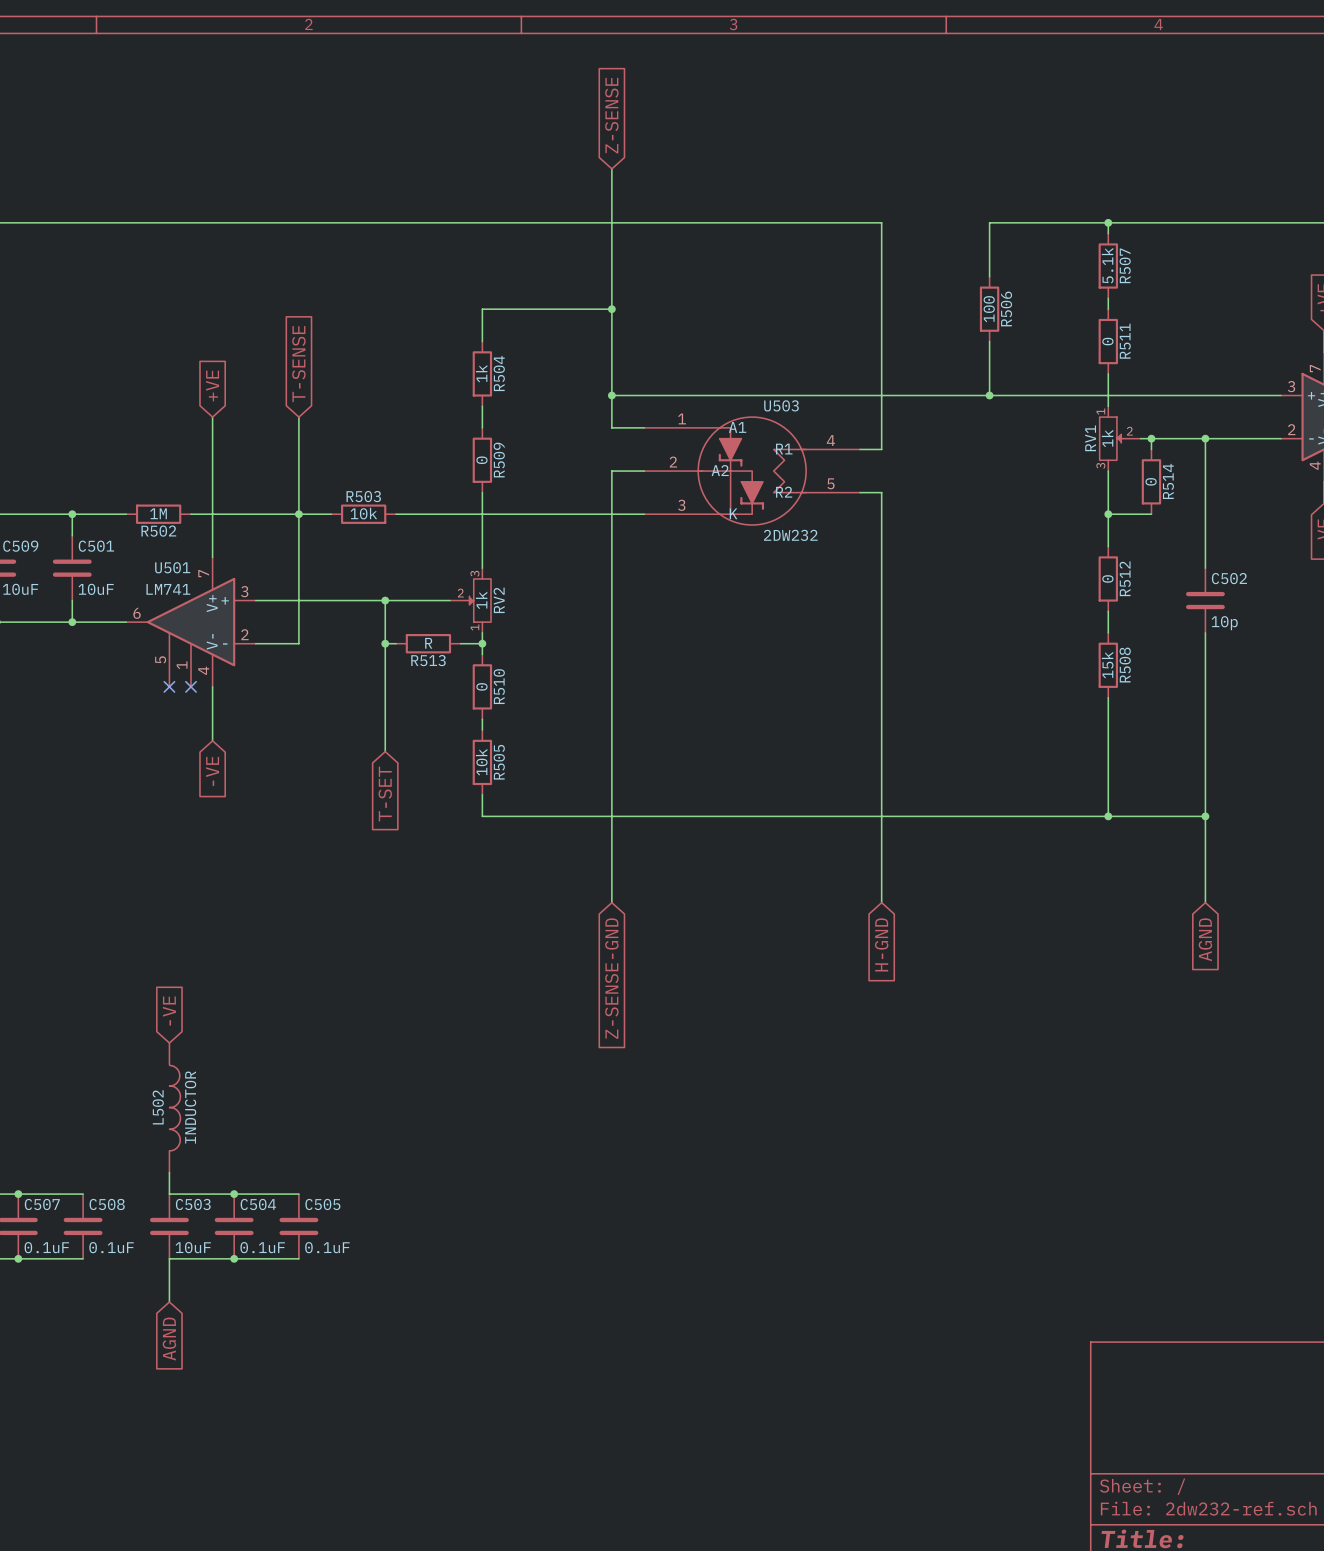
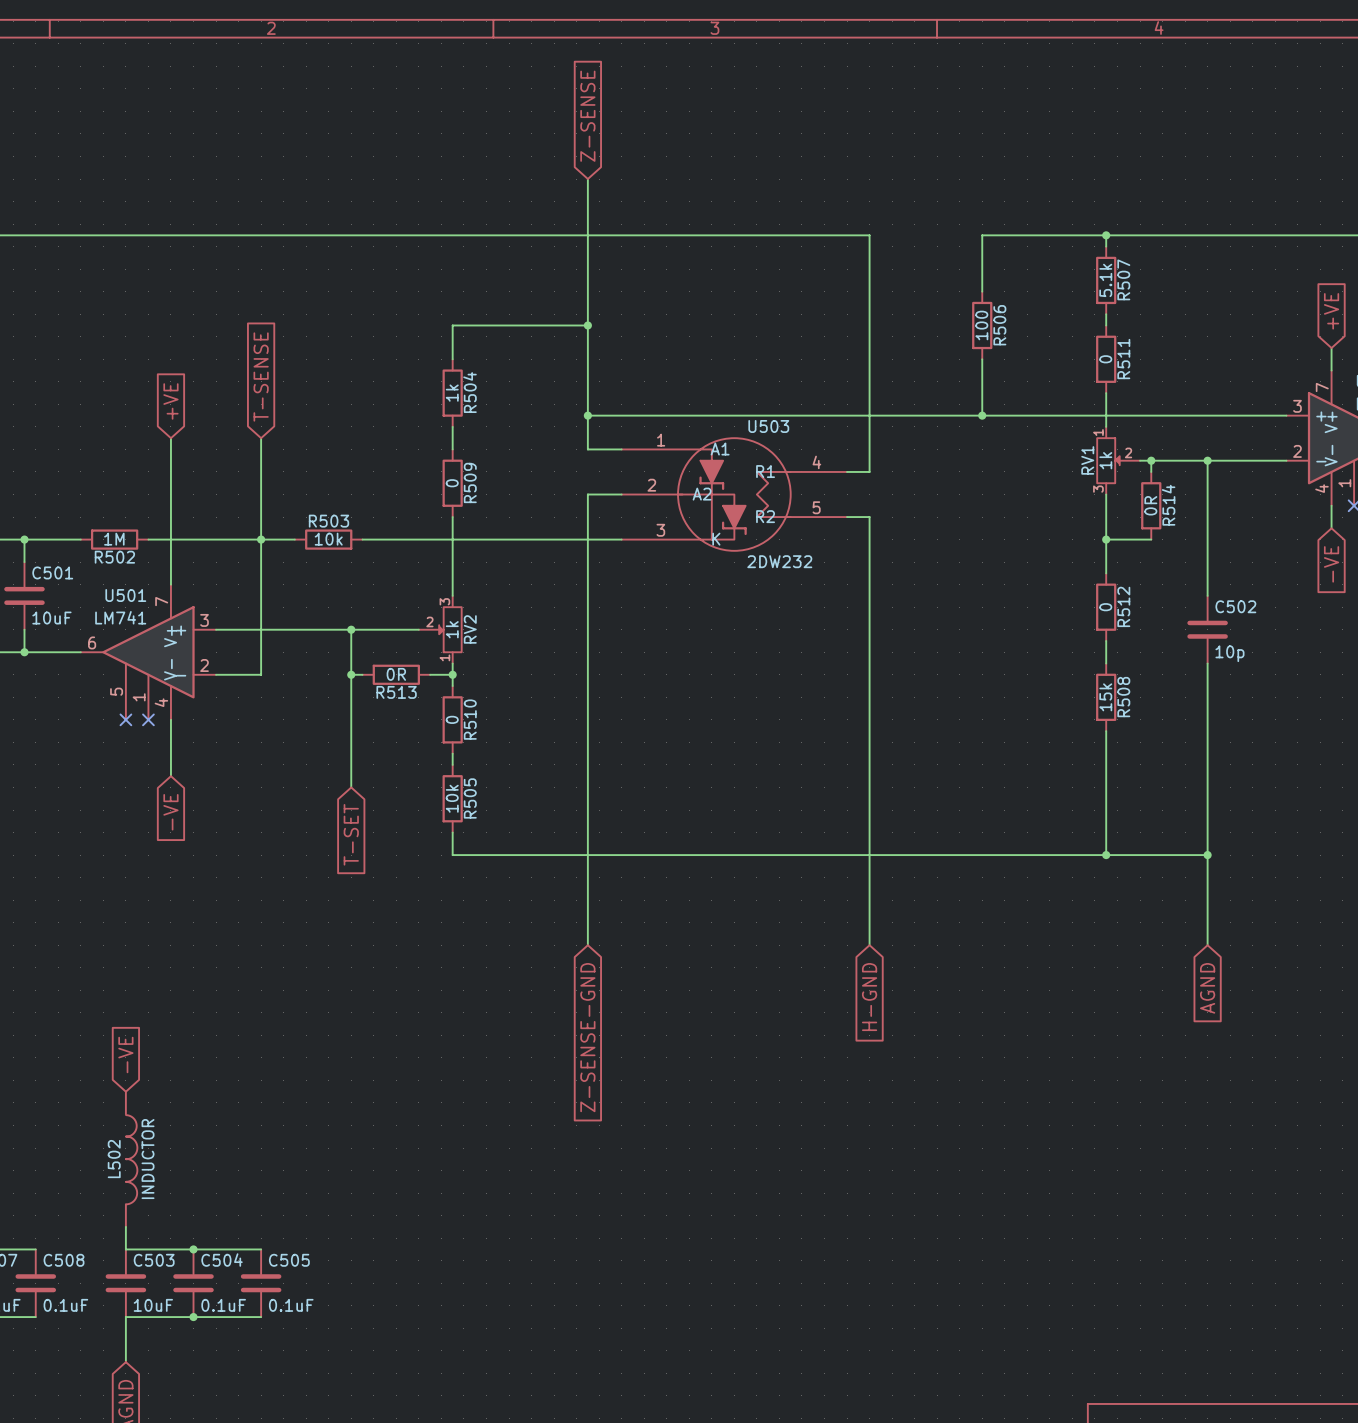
R514 value: 0 (1151, 481) -> 0R (1150, 505)
R513 value: R (428, 643) -> 0R (396, 674)

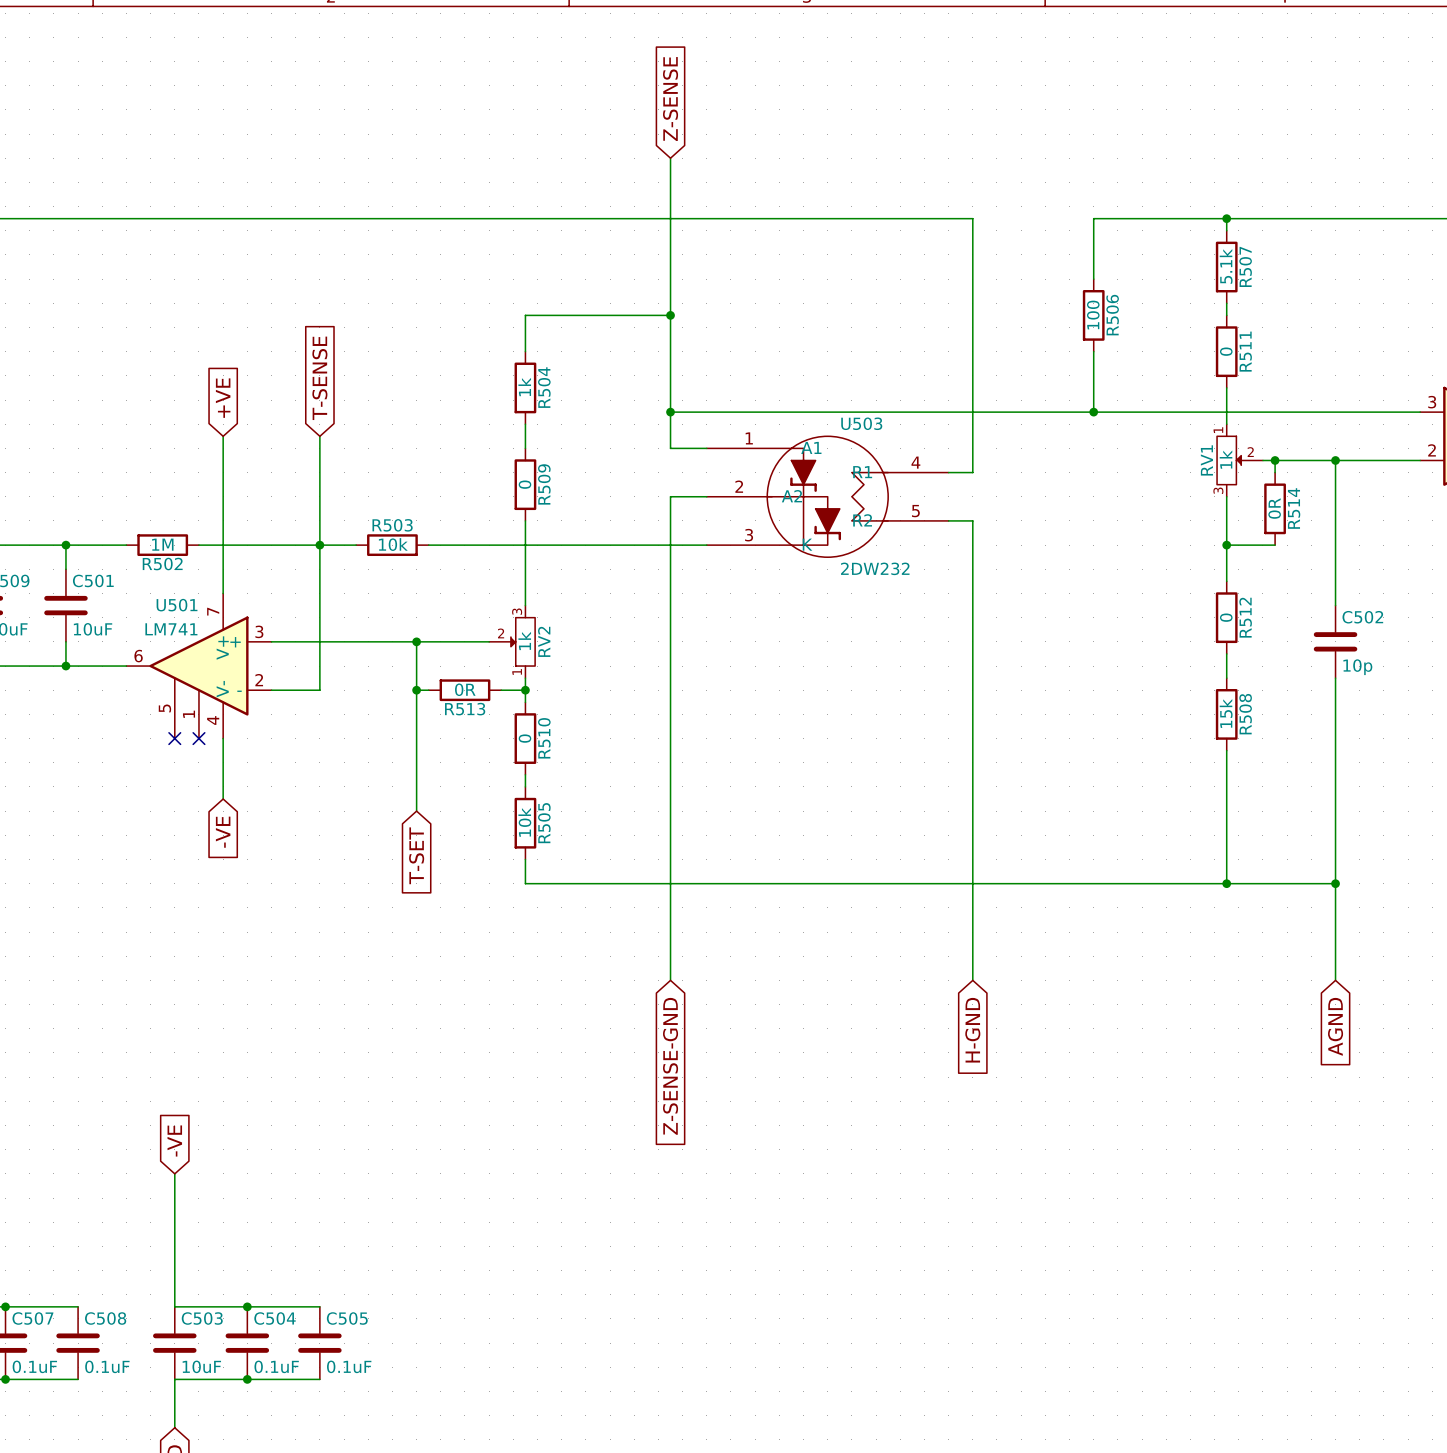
global label position: -VE (125, 1054) -> -VE (174, 1141)
wire: none -> (174, 1173) (174, 1282)
L502: INDUCTOR (131, 1159) -> none

